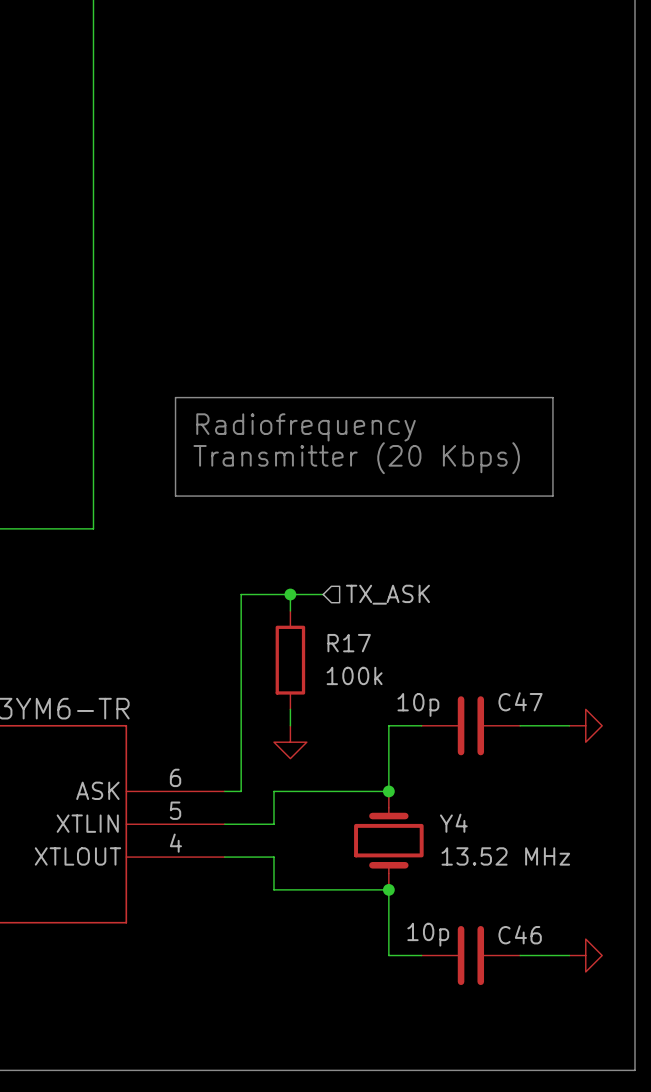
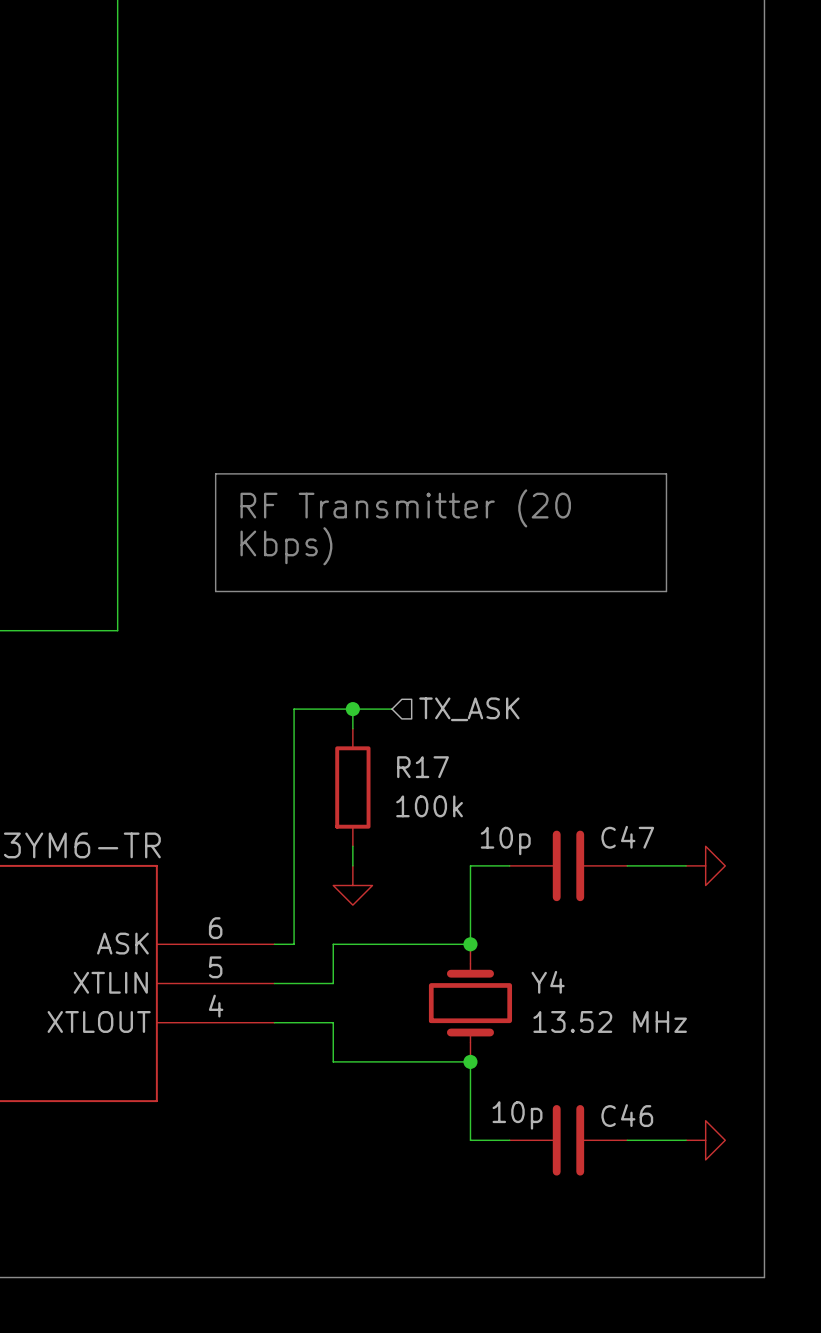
text: Radiofrequency (306, 427) -> RF Transmitter (20 (405, 508)
text: Transmitter (20 Kbps) (356, 458) -> Kbps) (286, 546)

